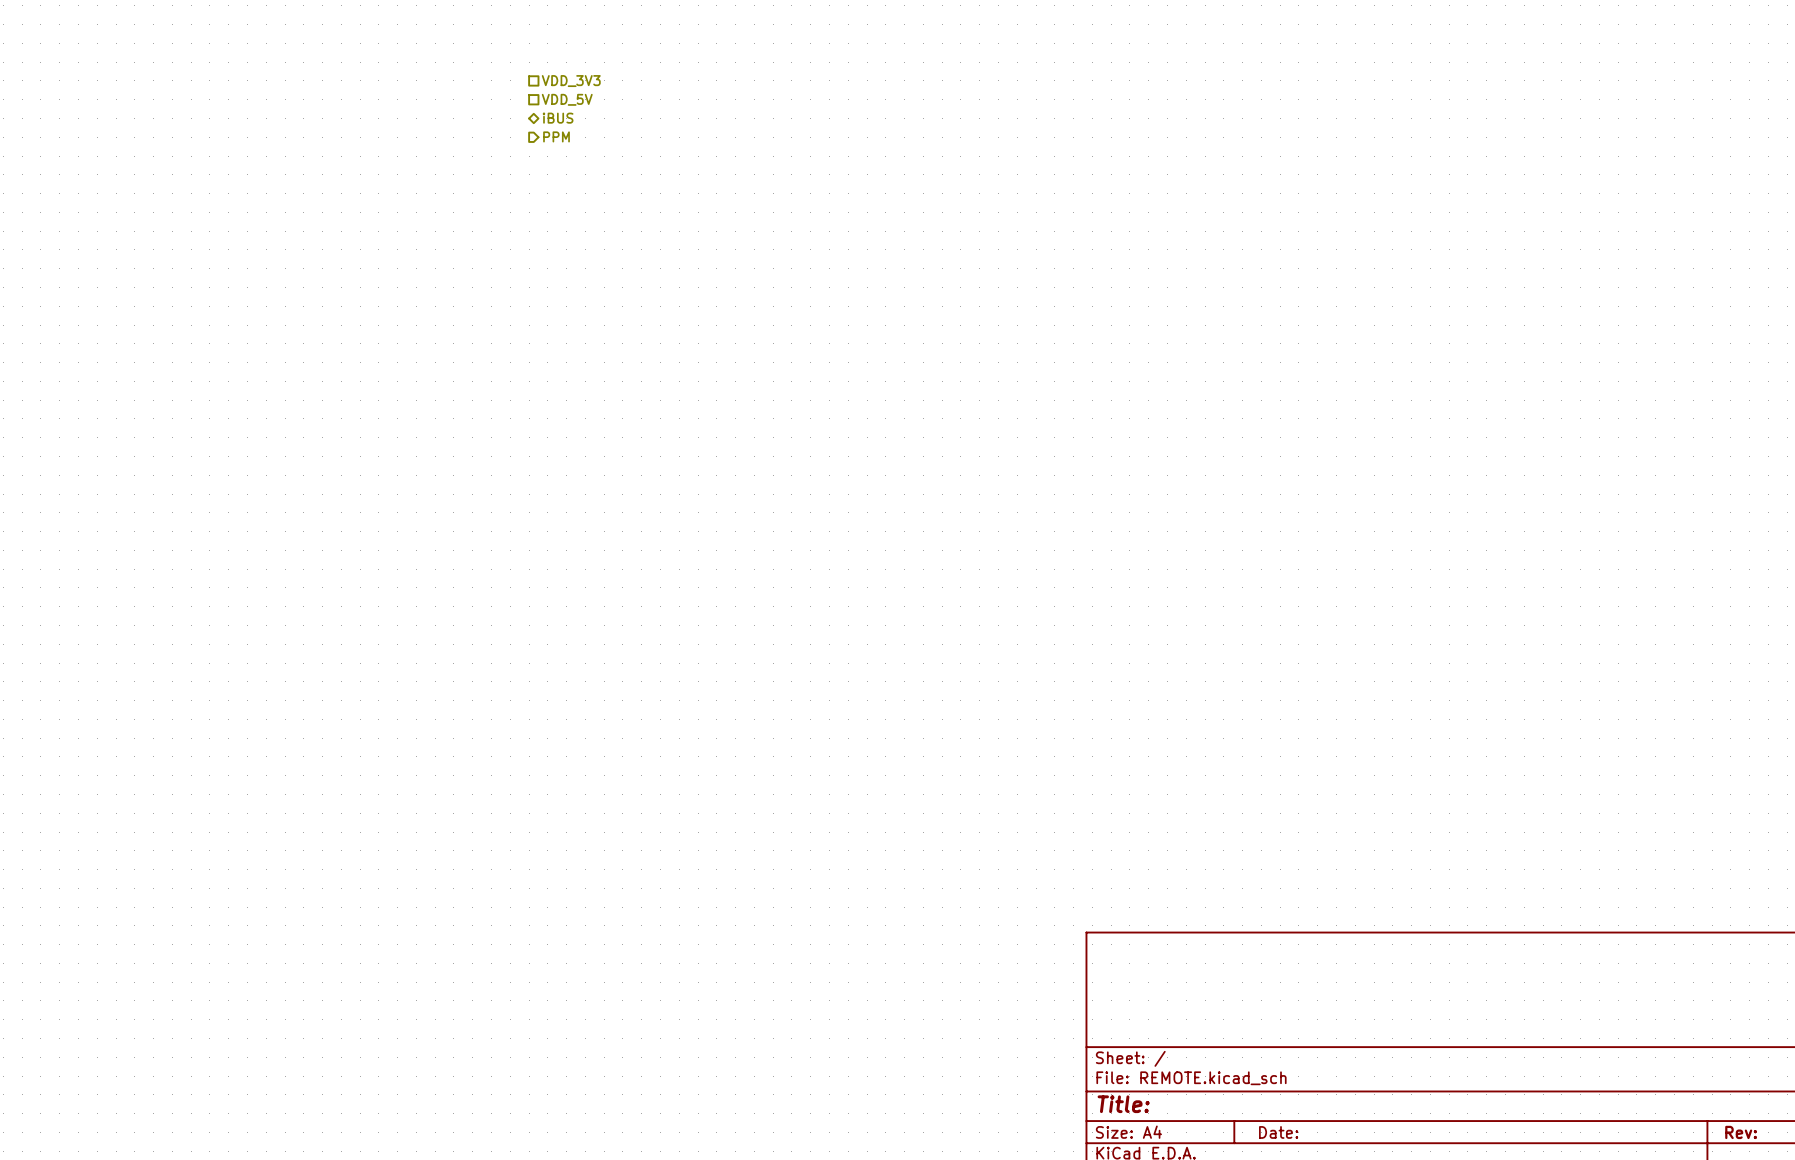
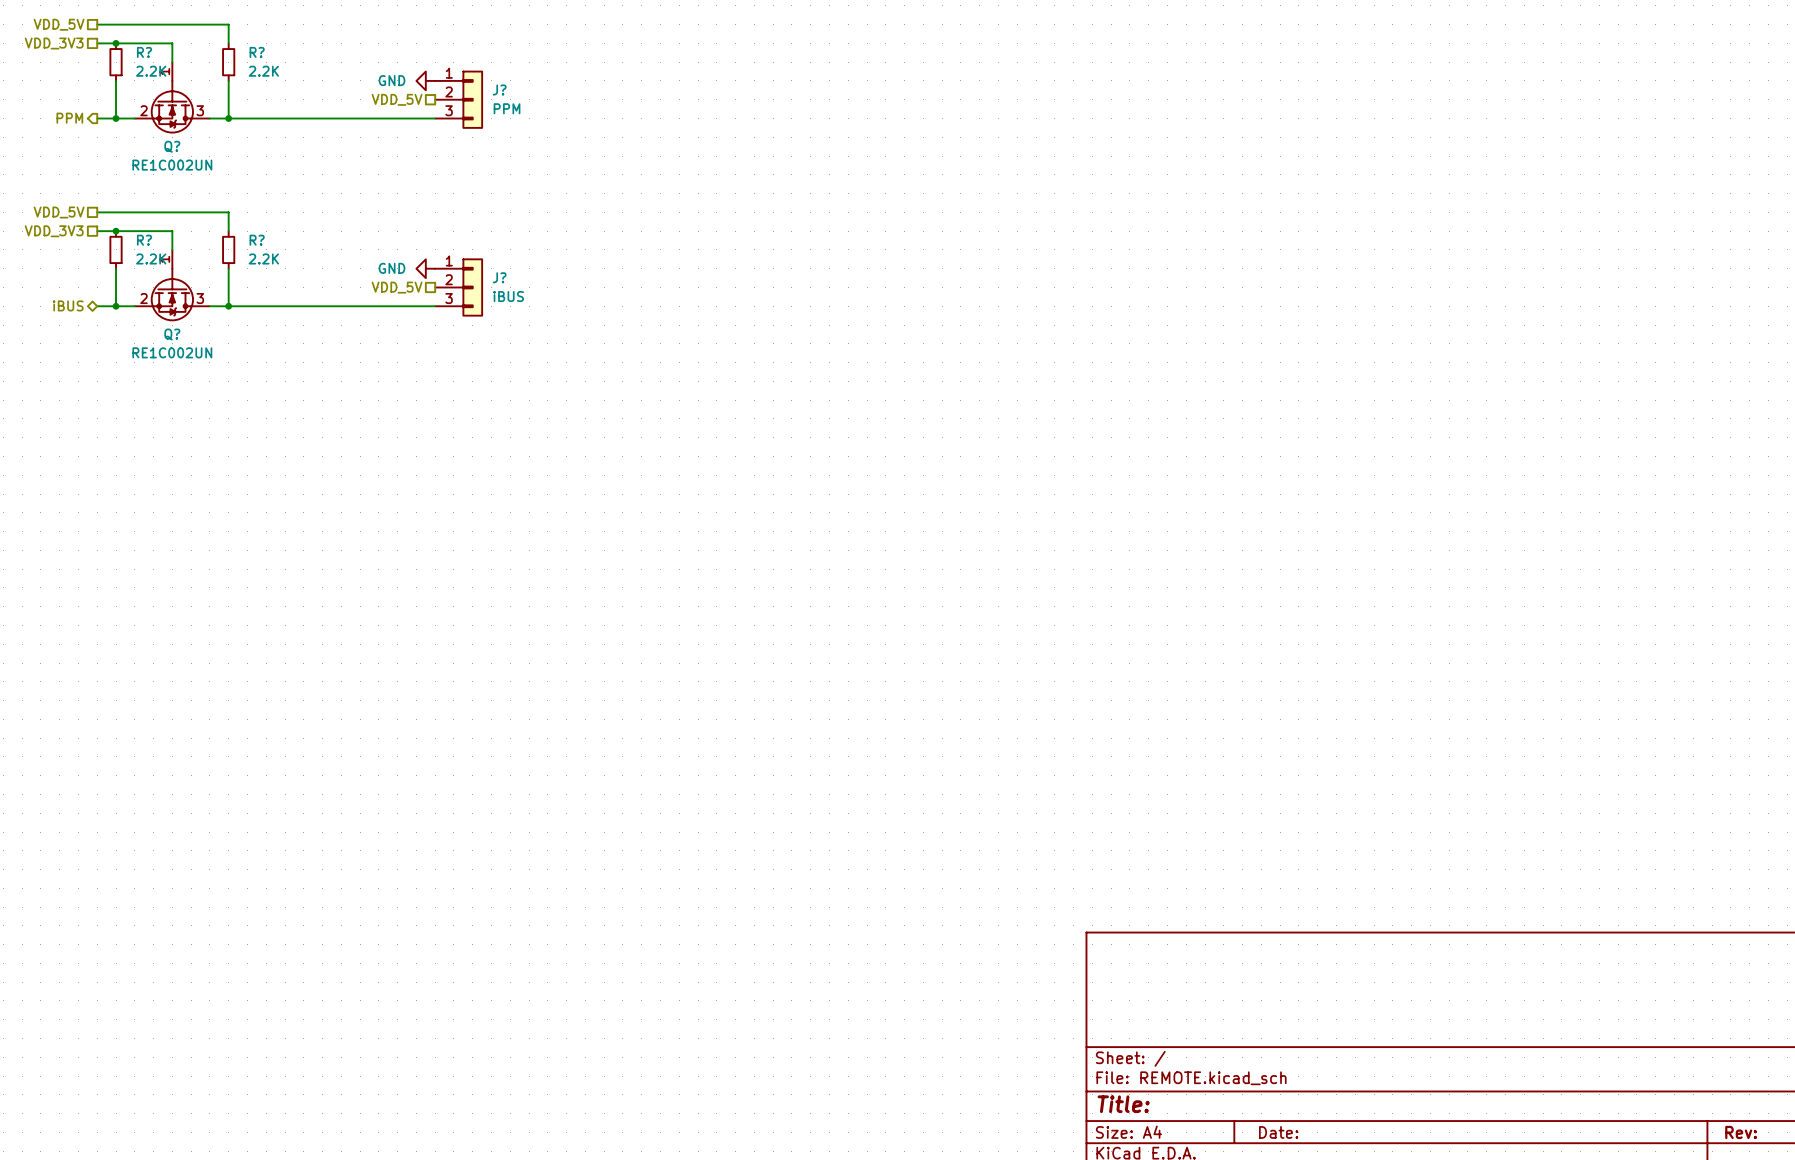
hierarchical label: none -> VDD_5V (59, 24)
wire: none -> (97, 24) (228, 24) (228, 43)
hierarchical label: none -> VDD_3V3 (54, 43)
wire: none -> (97, 43) (172, 43) (172, 62)
junction: none -> (116, 43)
R?: none -> 2.2K (116, 62)
R?: none -> 2.2K (228, 62)
wire: none -> (116, 80) (116, 118)
wire: none -> (228, 80) (228, 118)
power symbol: none -> GND (425, 80)
hierarchical label: VDD_3V3 (571, 81) -> none
Q?: none -> RE1C002UN (172, 97)
hierarchical label: none -> VDD_5V (397, 99)
J?: none -> PPM (459, 99)
hierarchical label: VDD_5V (567, 99) -> none
hierarchical label: none -> PPM (69, 118)
wire: none -> (97, 118) (134, 118)
junction: none -> (116, 118)
wire: none -> (209, 118) (435, 118)
junction: none -> (228, 118)
hierarchical label: iBUS (558, 118) -> none
hierarchical label: PPM (556, 136) -> none
hierarchical label: none -> VDD_5V (59, 212)
wire: none -> (97, 212) (228, 212) (228, 231)
hierarchical label: none -> VDD_3V3 (54, 231)
wire: none -> (97, 231) (172, 231) (172, 249)
junction: none -> (116, 231)
R?: none -> 2.2K (116, 249)
R?: none -> 2.2K (228, 249)
wire: none -> (116, 268) (116, 306)
wire: none -> (228, 268) (228, 306)
power symbol: none -> GND (425, 268)
Q?: none -> RE1C002UN (172, 285)
hierarchical label: none -> VDD_5V (397, 287)
J?: none -> iBUS (459, 287)
hierarchical label: none -> iBUS (68, 305)
wire: none -> (97, 306) (134, 306)
junction: none -> (116, 306)
wire: none -> (209, 306) (435, 306)
junction: none -> (228, 306)

